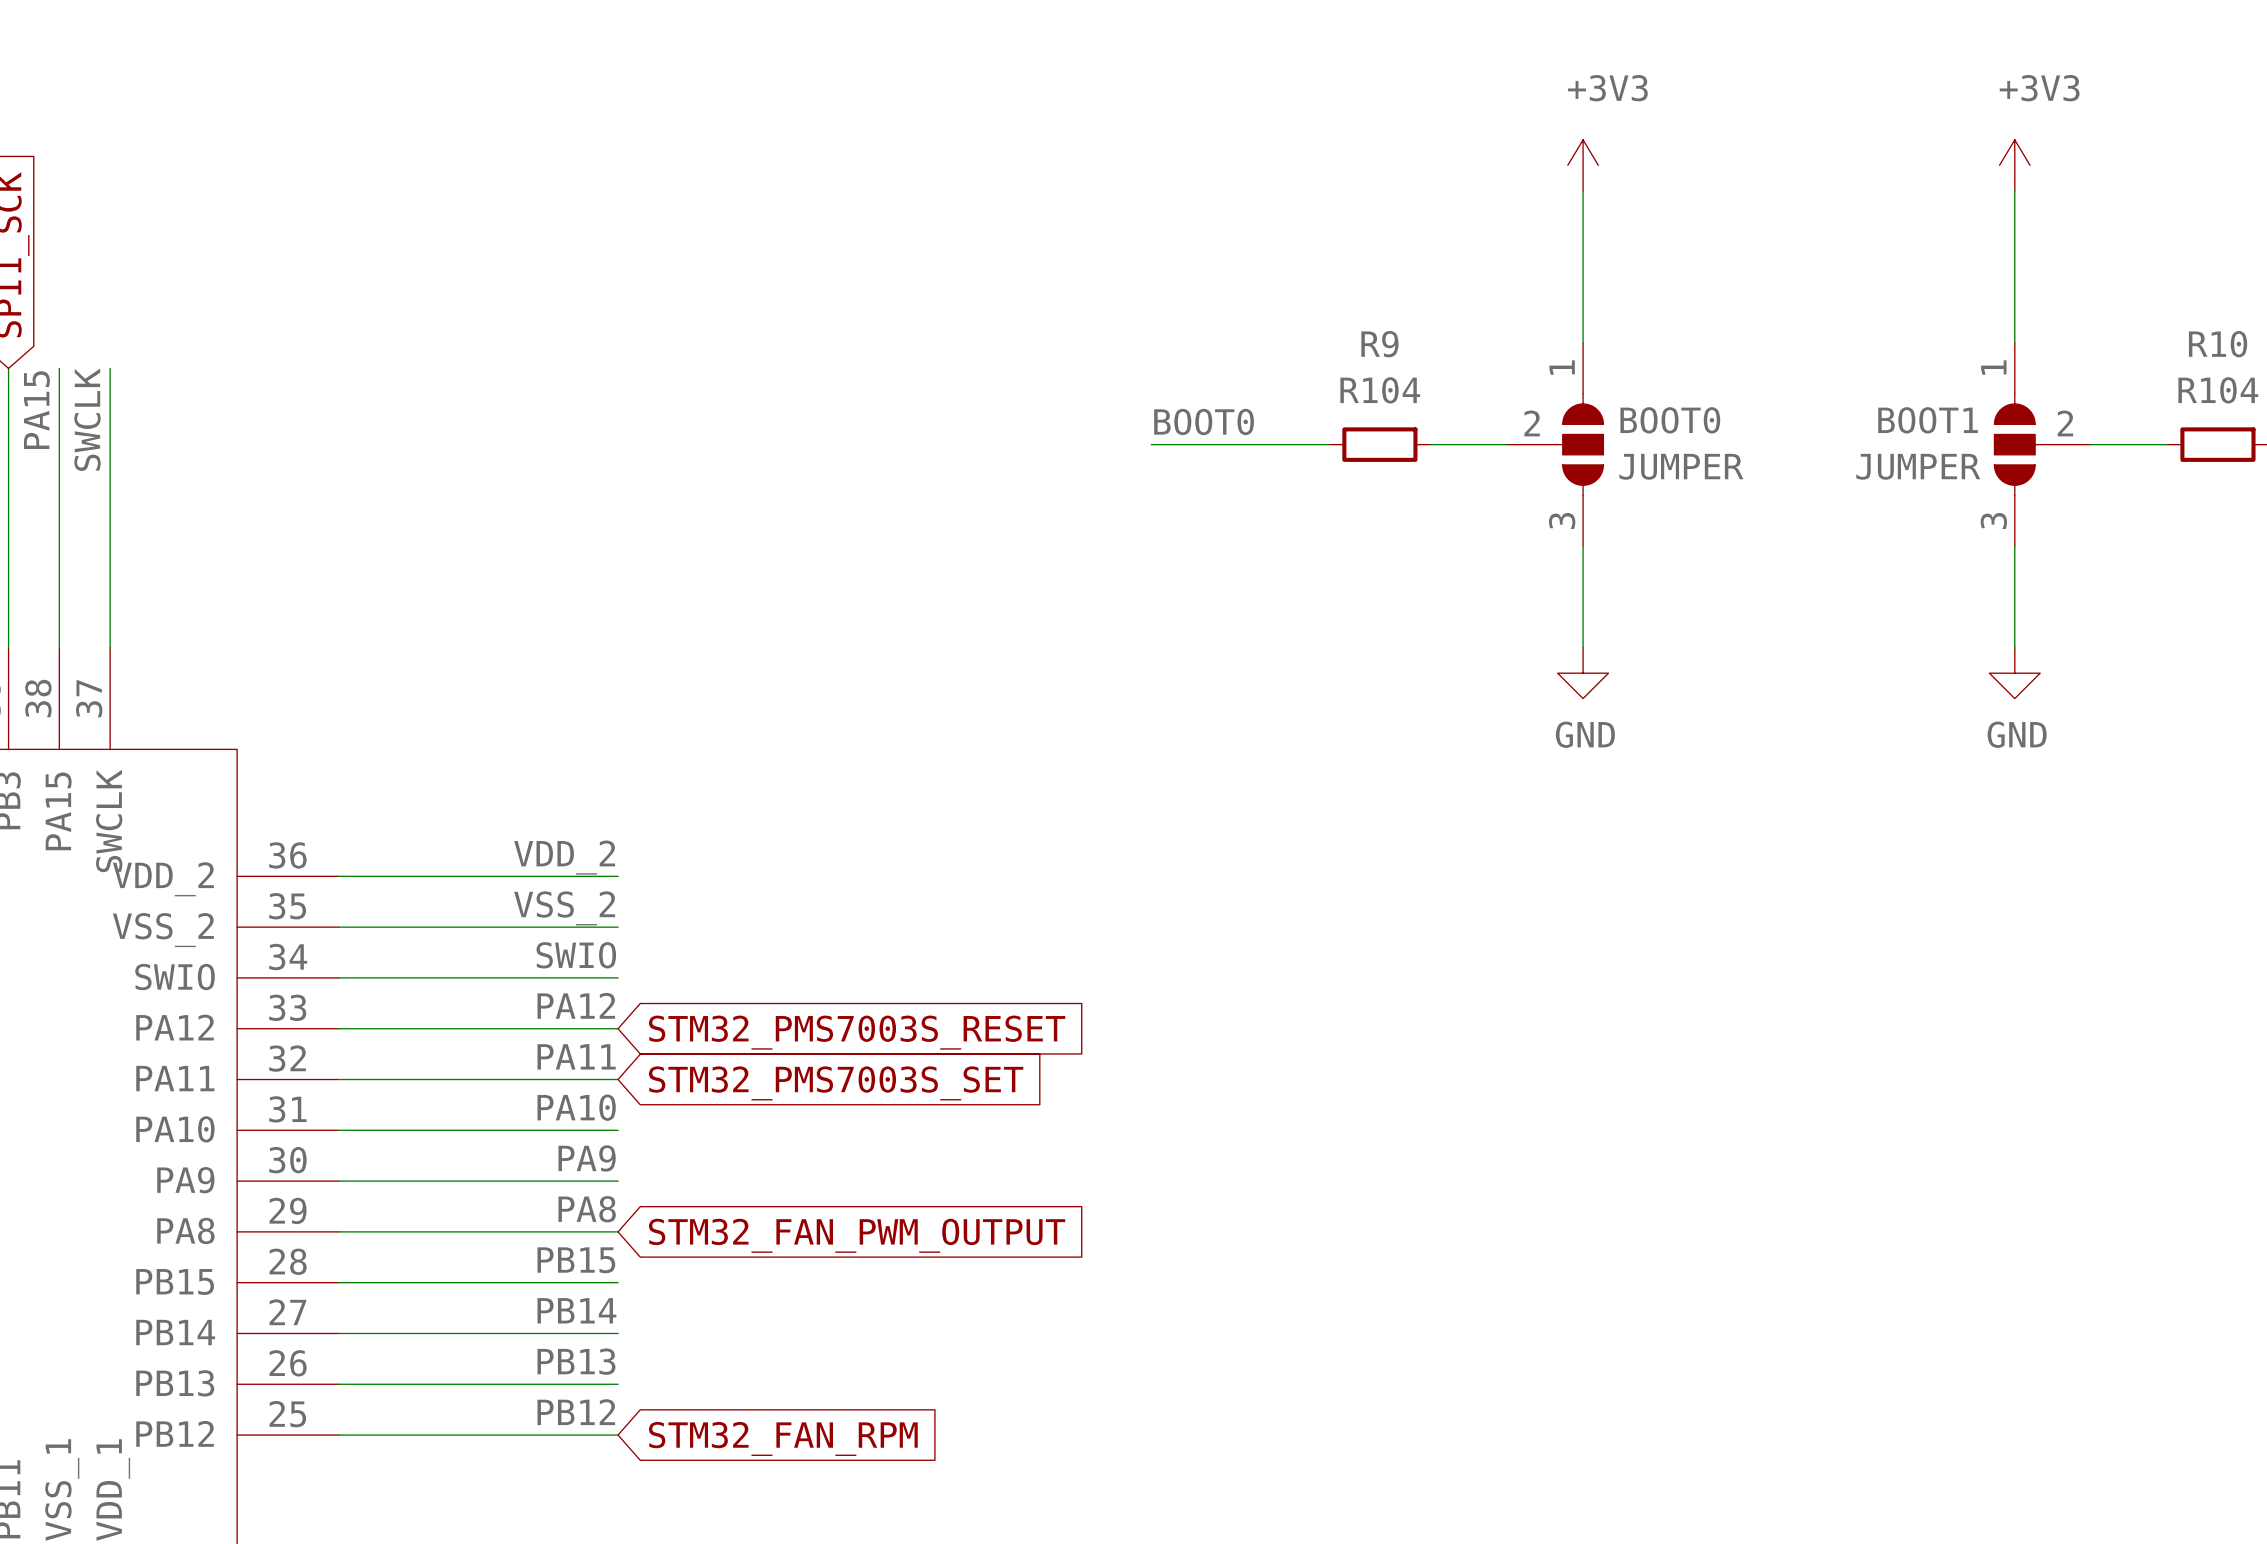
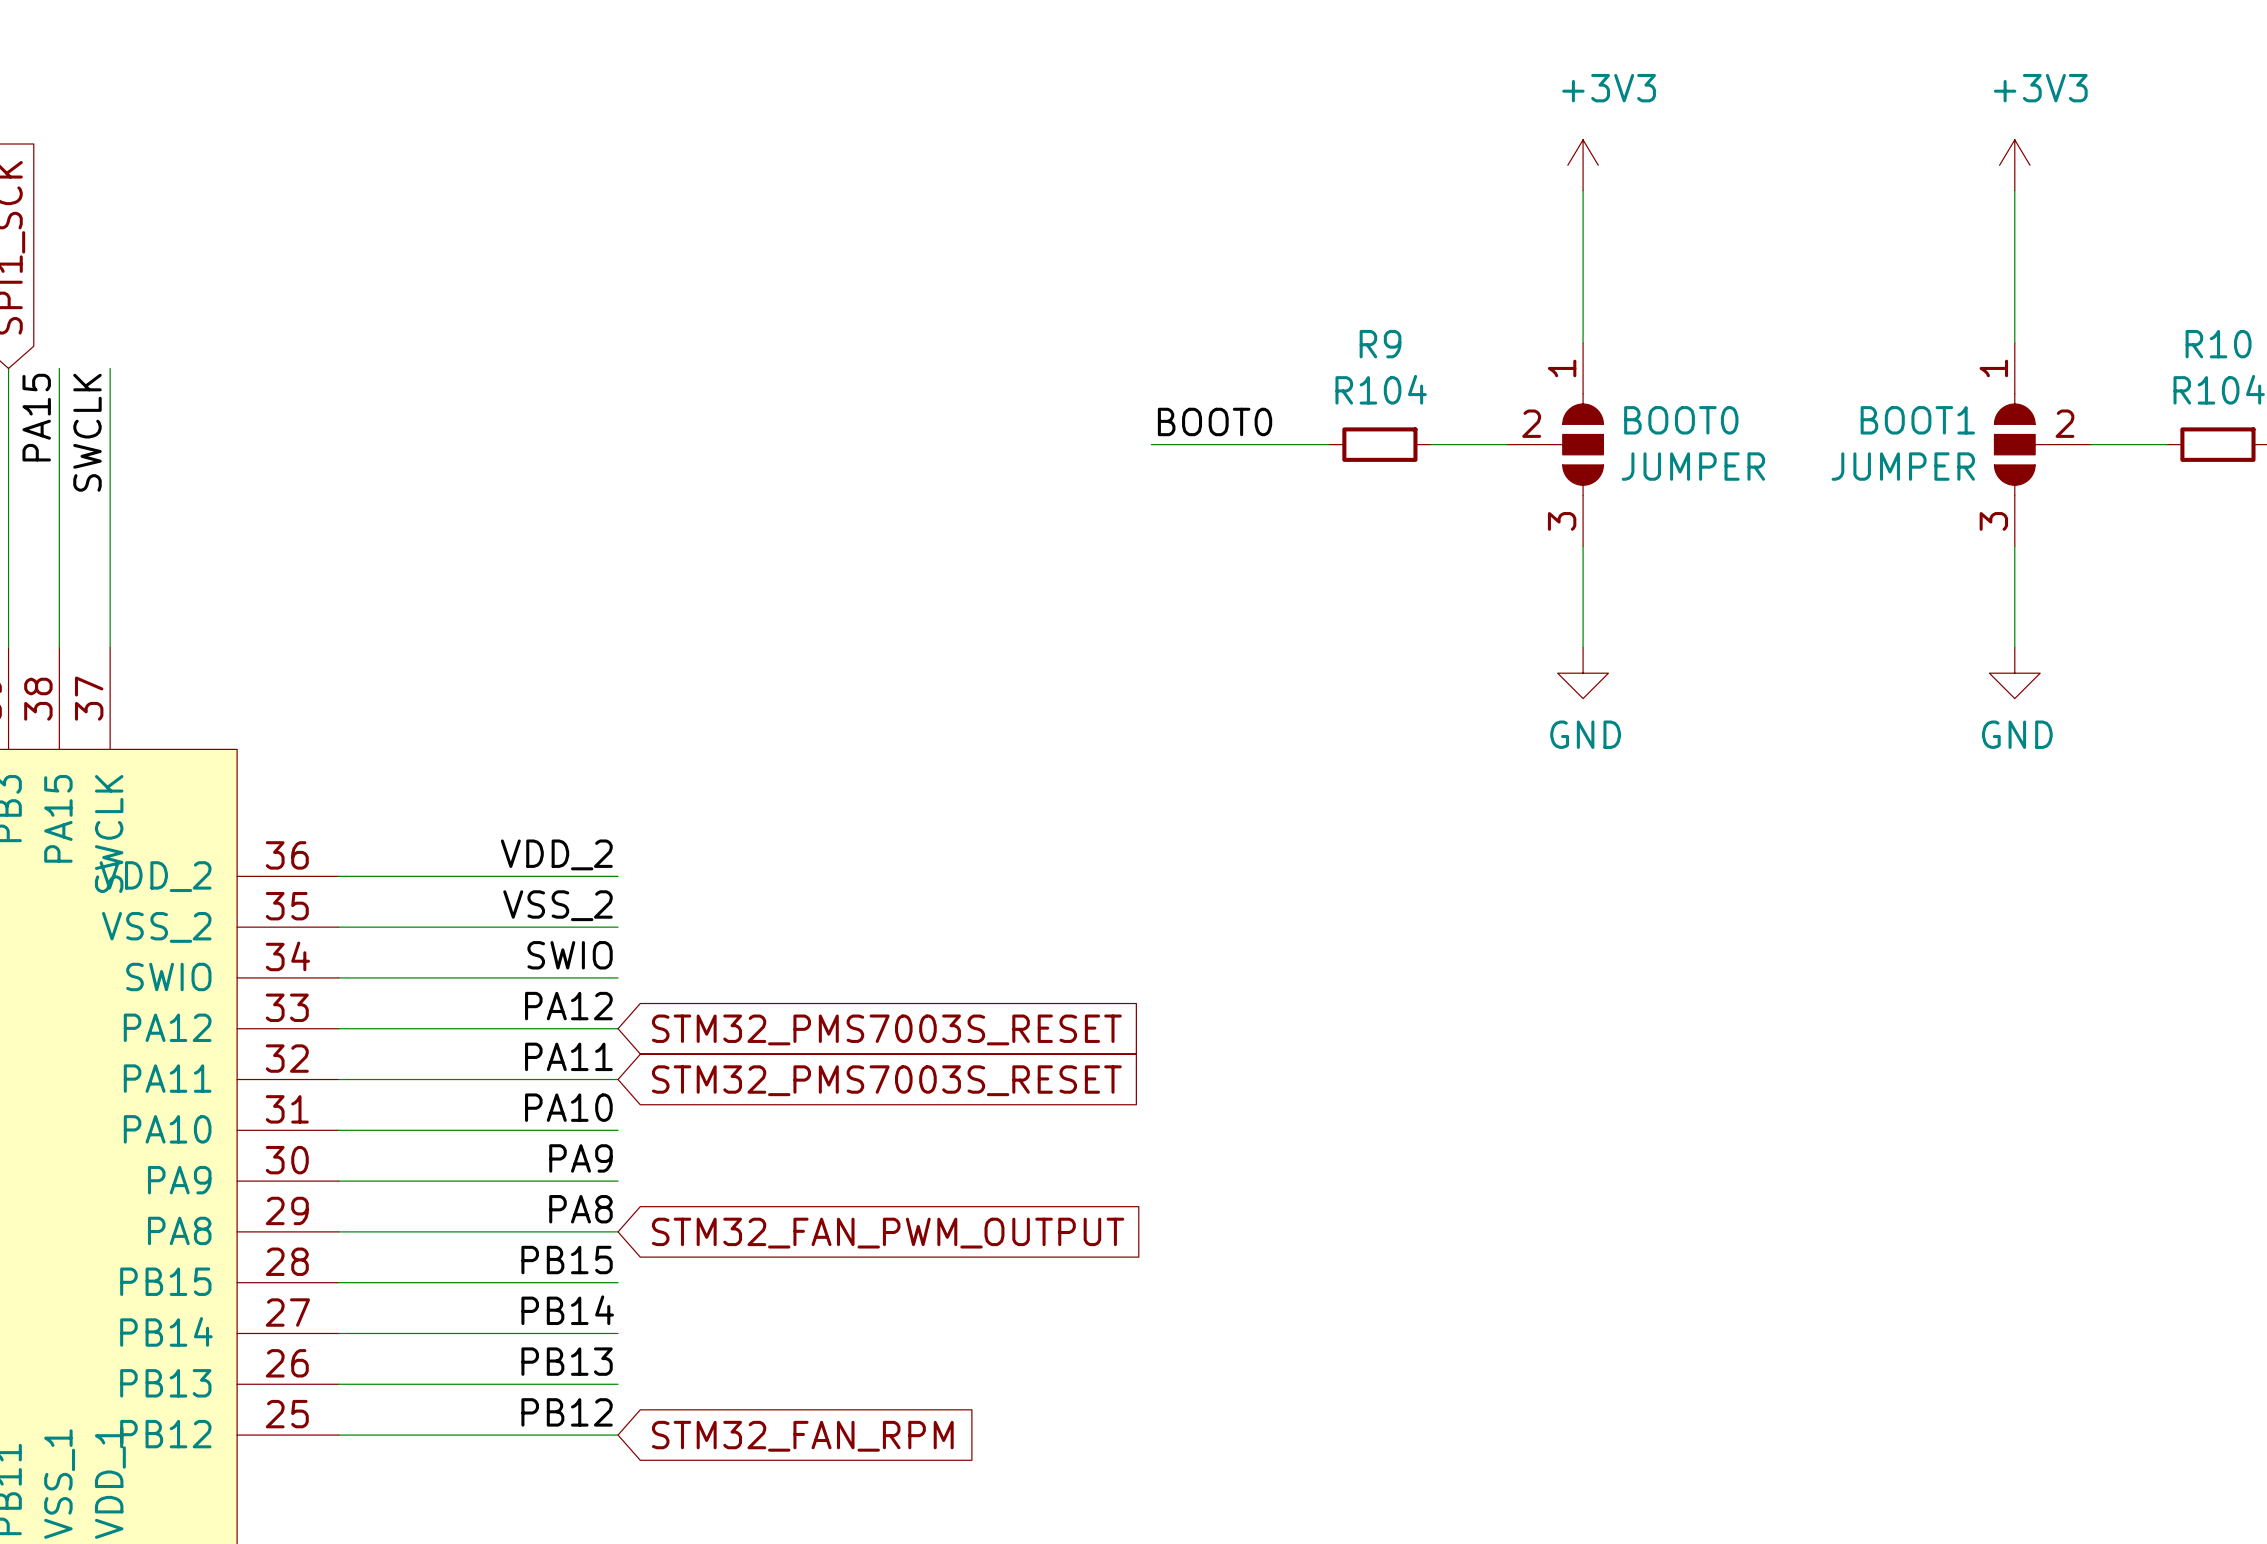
global label: STM32_PMS7003S_SET (836, 1083) -> STM32_PMS7003S_RESET (886, 1080)

